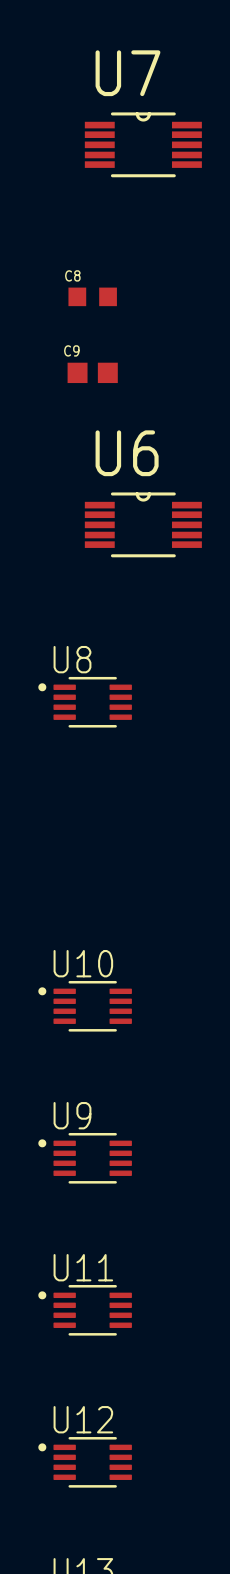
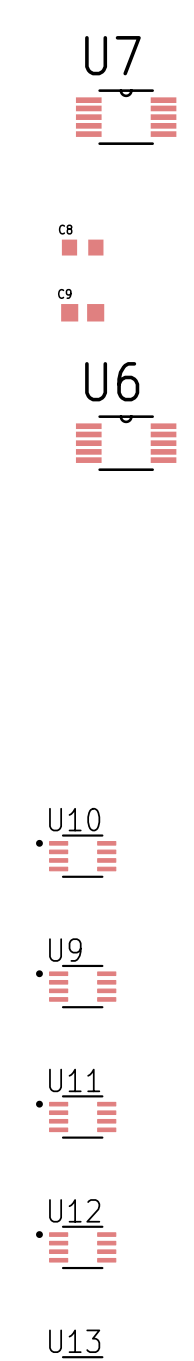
U8: (85, 702) -> none

